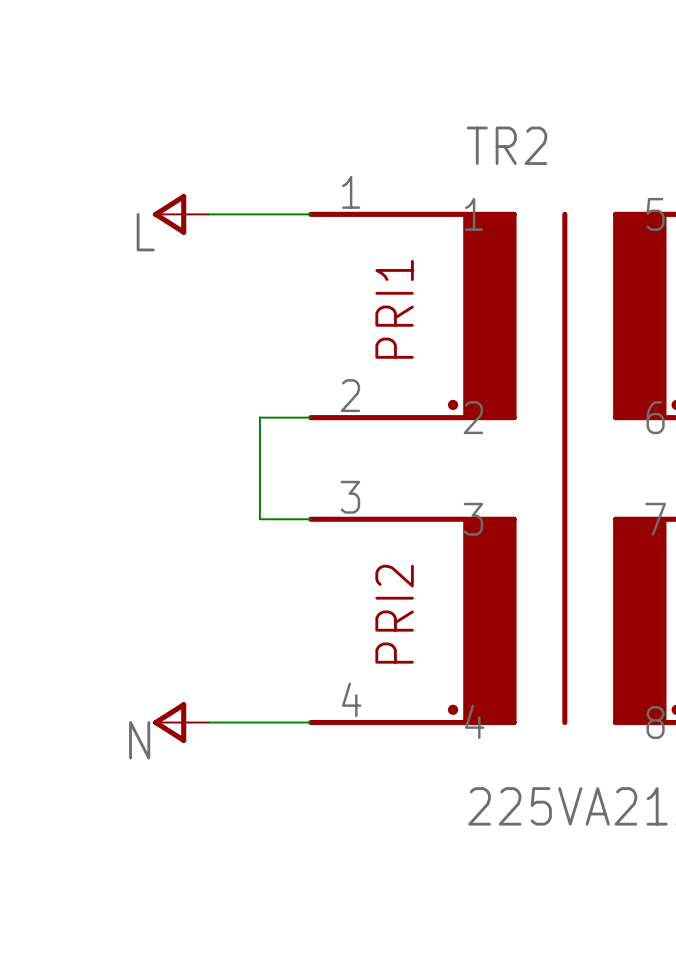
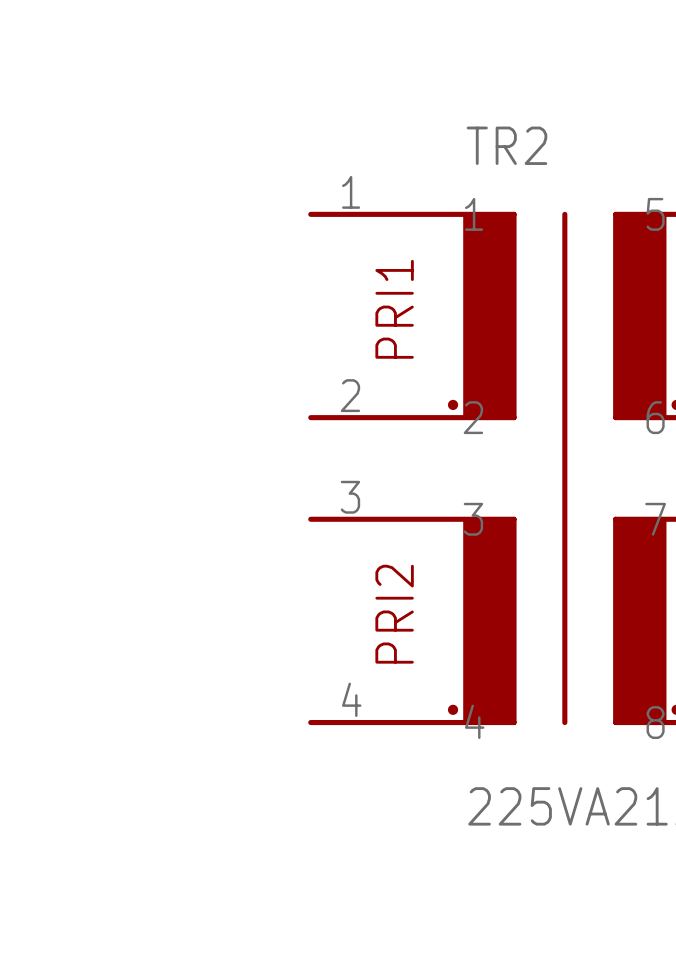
power symbol: L (181, 214) -> none
wire: (209, 214) (310, 214) -> none
wire: (310, 417) (259, 417) (259, 519) (310, 519) -> none
power symbol: N (181, 722) -> none
wire: (209, 722) (310, 722) -> none

